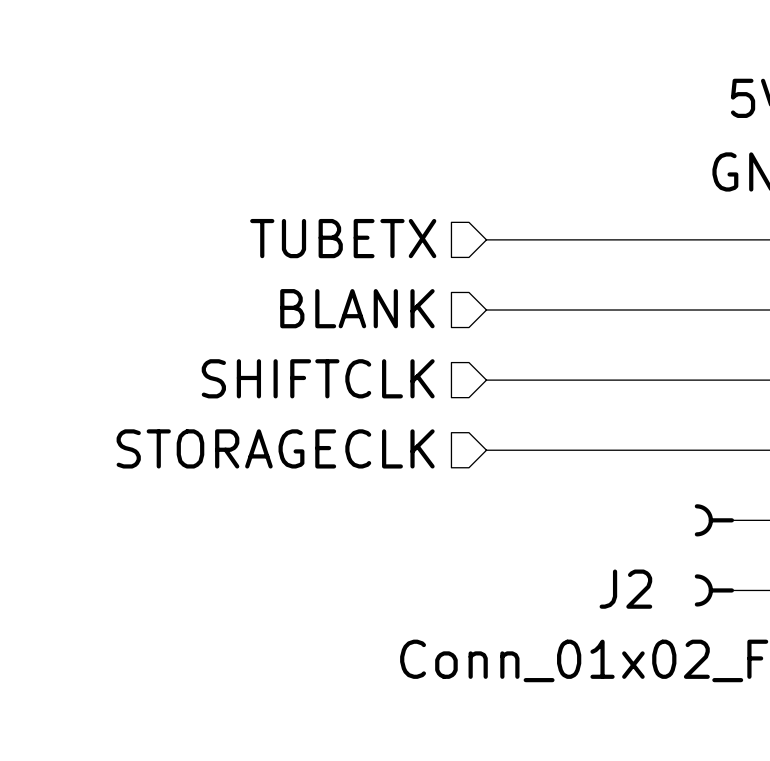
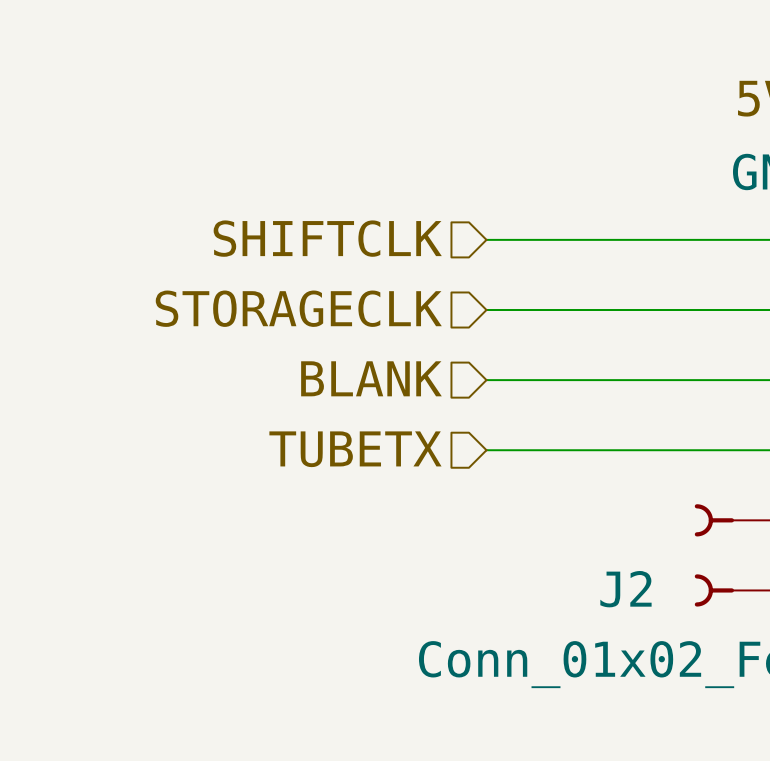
hierarchical label: TUBETX (343, 238) -> SHIFTCLK (327, 238)
hierarchical label: BLANK (357, 308) -> STORAGECLK (298, 308)
hierarchical label: SHIFTCLK (318, 378) -> BLANK (371, 378)
hierarchical label: STORAGECLK (275, 448) -> TUBETX (355, 449)

